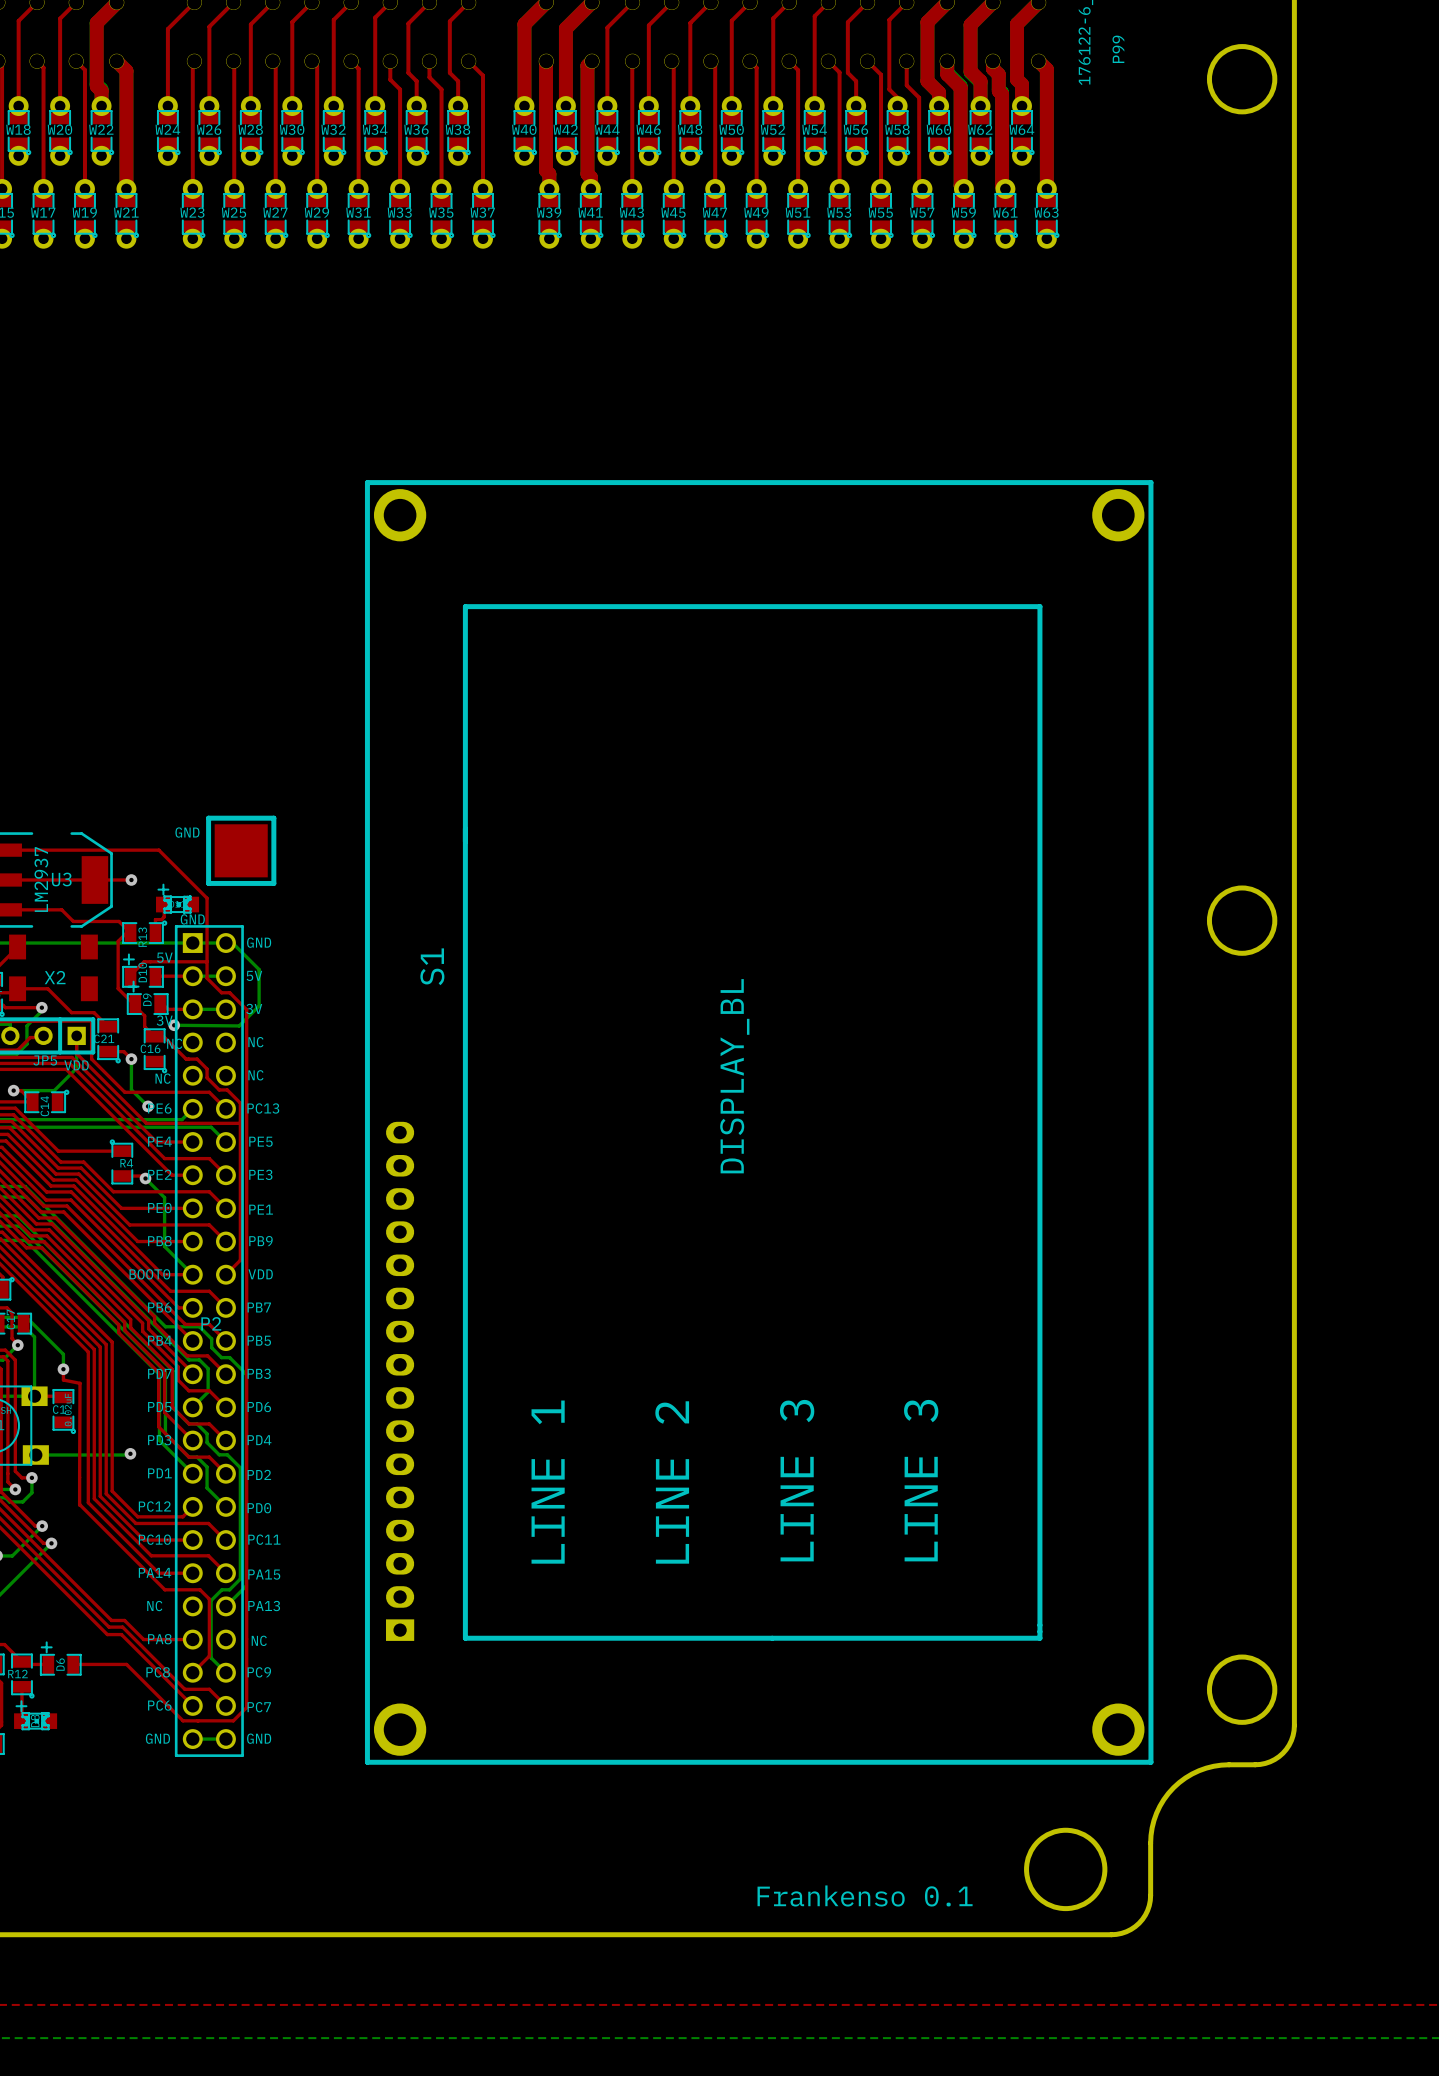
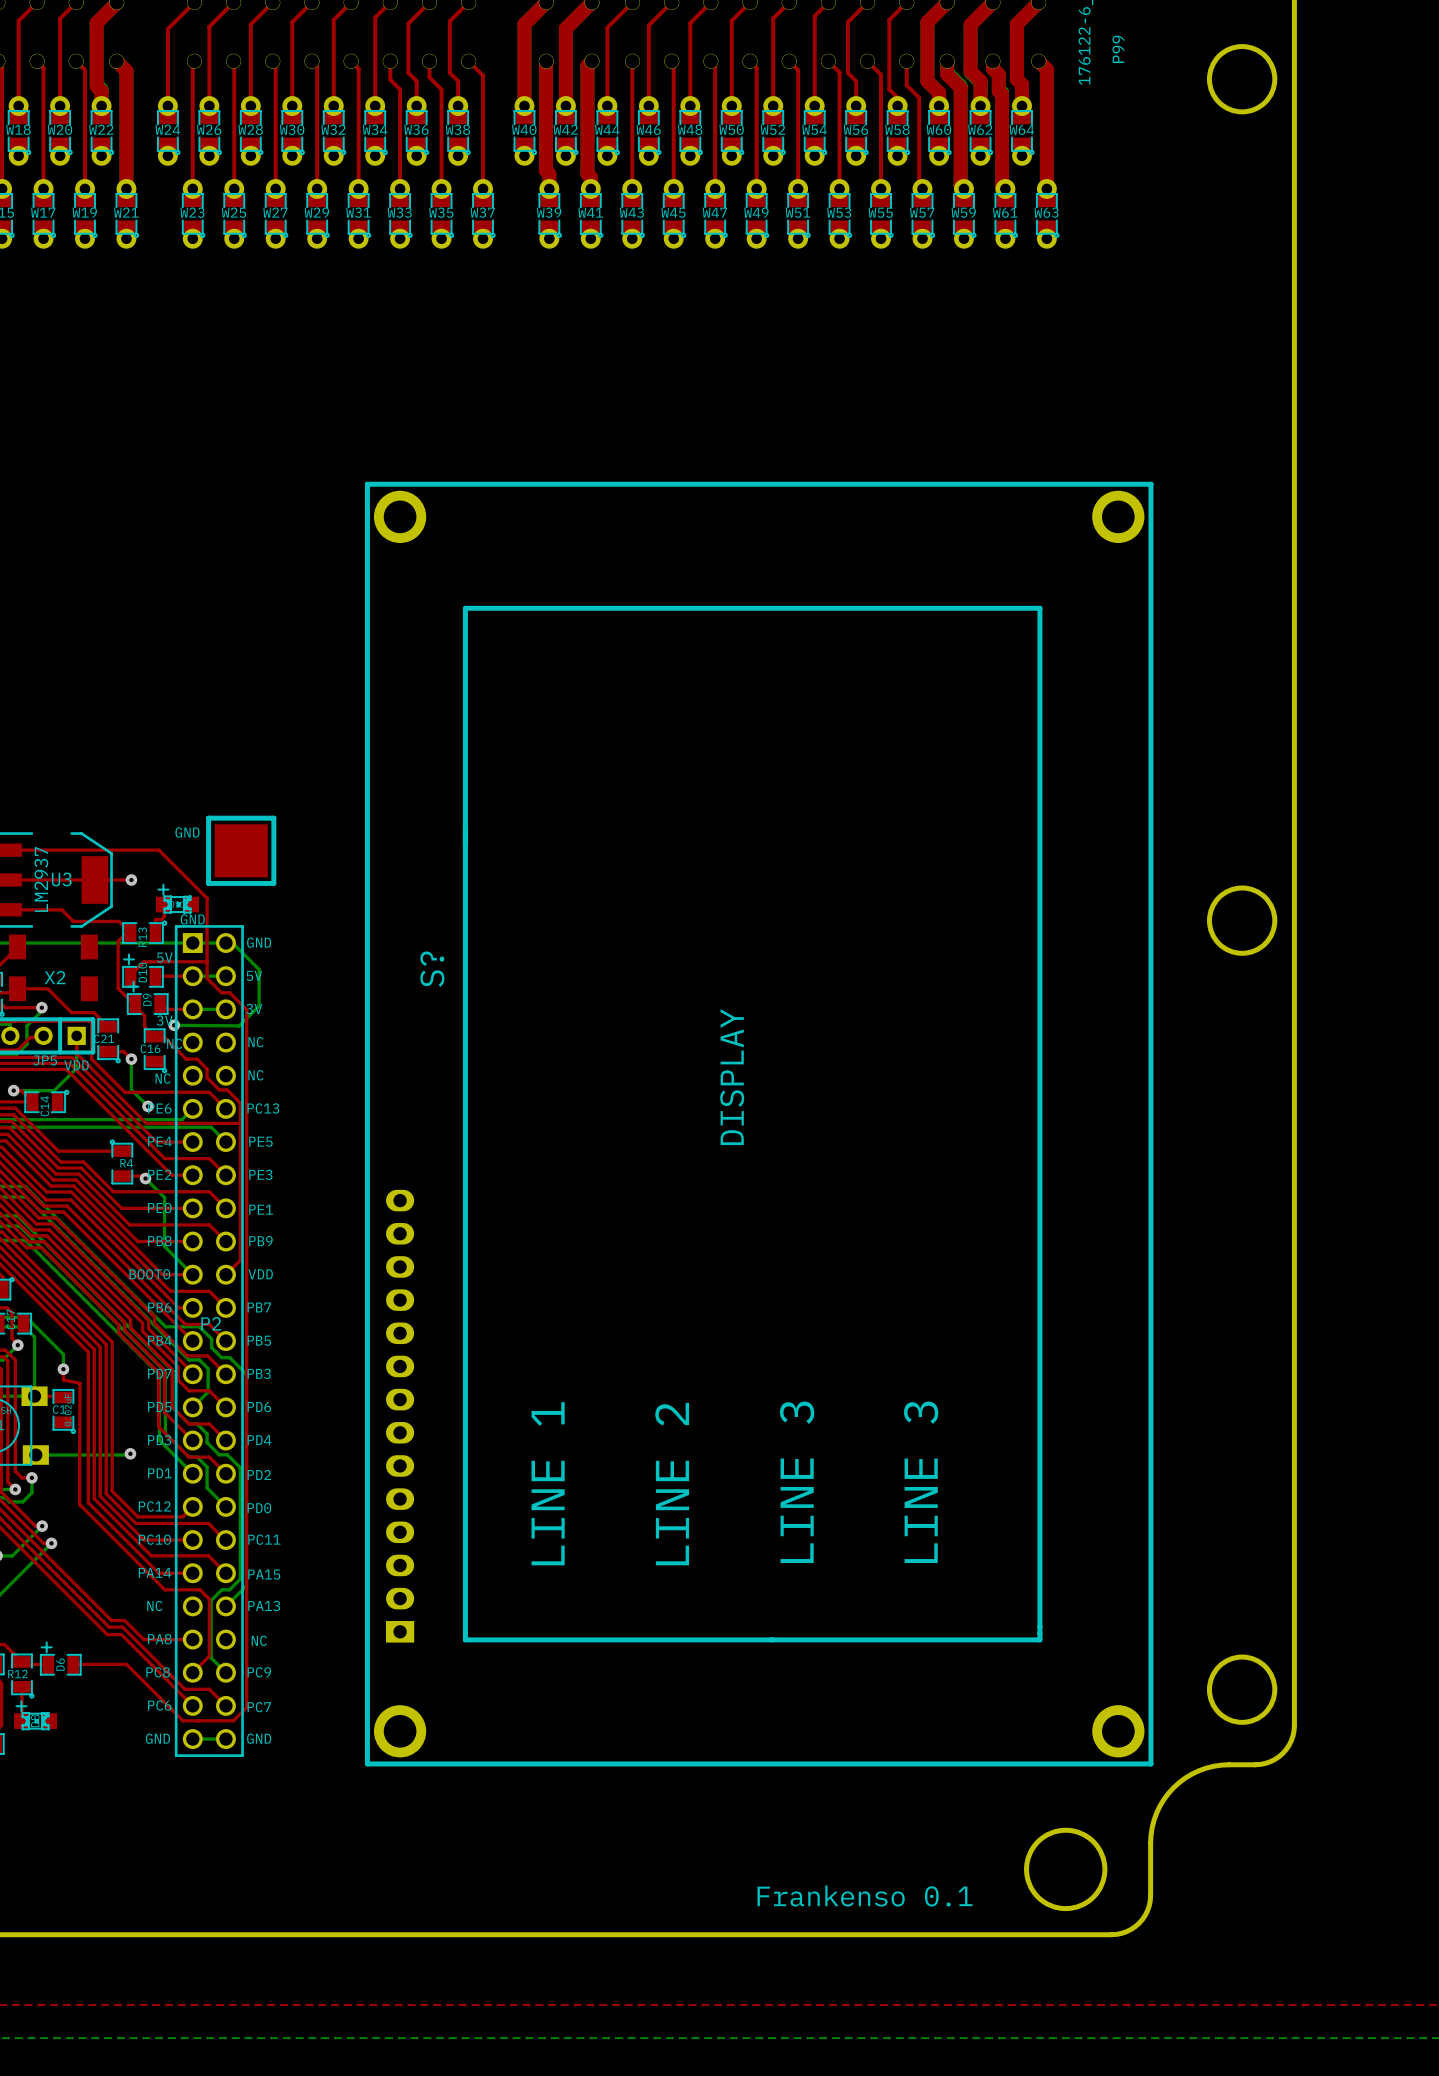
S1: DISPLAY_BL (759, 1122) -> none
S?: none -> DISPLAY (759, 1124)

